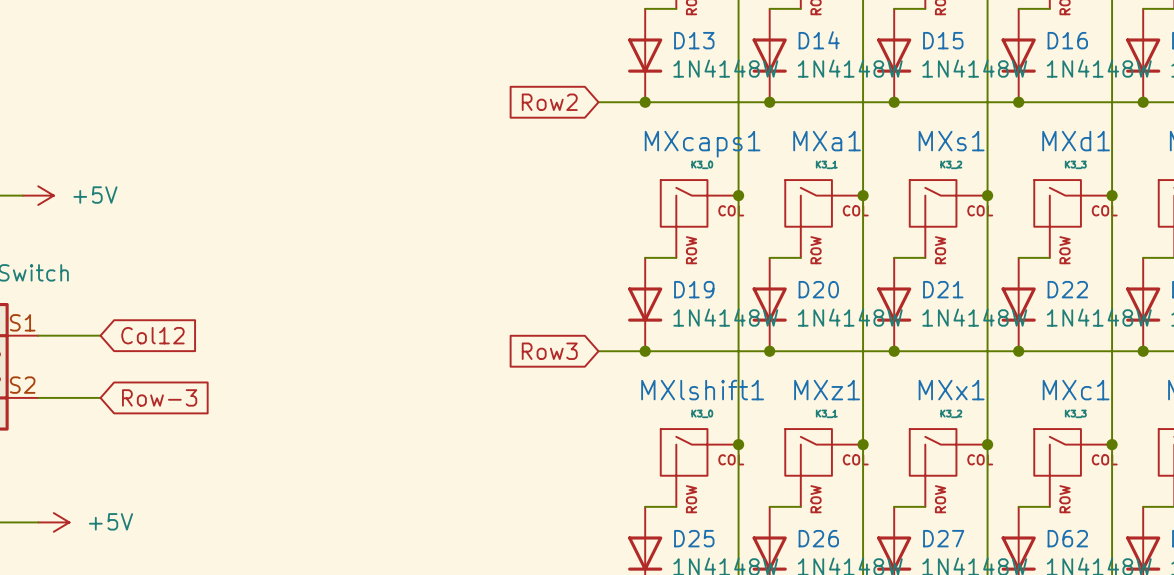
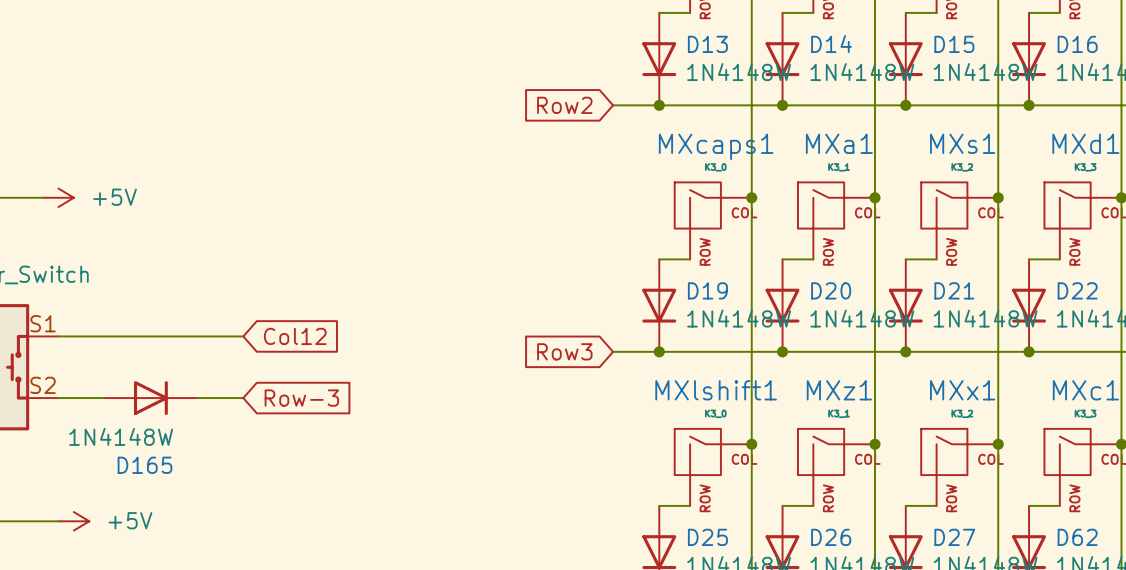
wire: none -> (120, 336) (243, 336)
global label position: Col12 (152, 335) -> Col12 (295, 336)
D165: none -> 1N4148W (150, 398)
global label position: Row-3 (159, 397) -> Row-3 (301, 398)
wire: none -> (197, 398) (243, 398)

